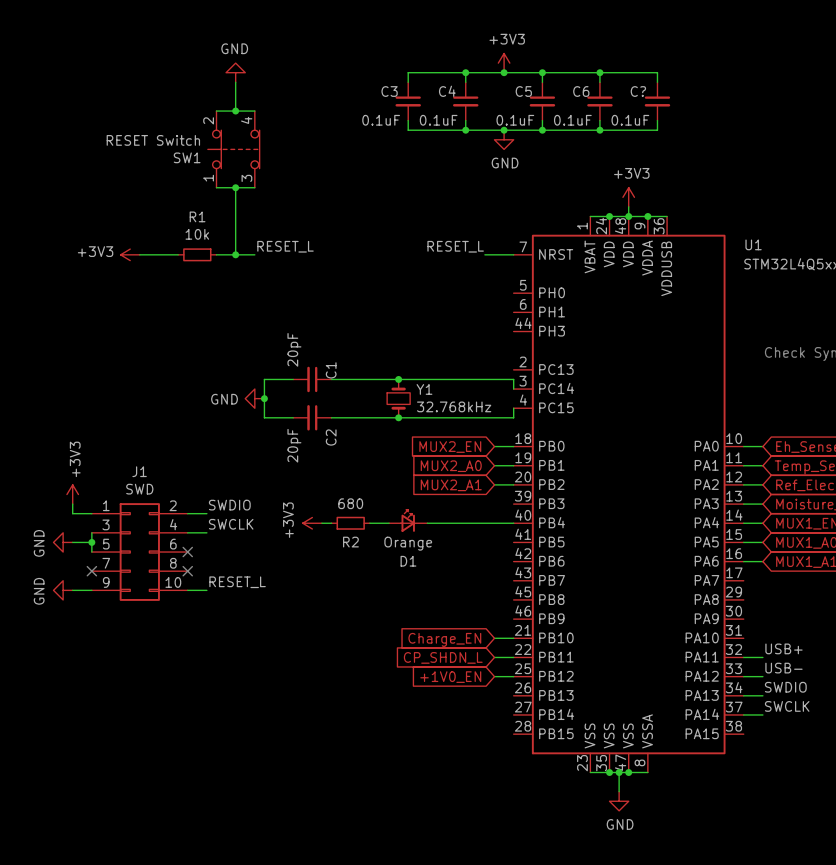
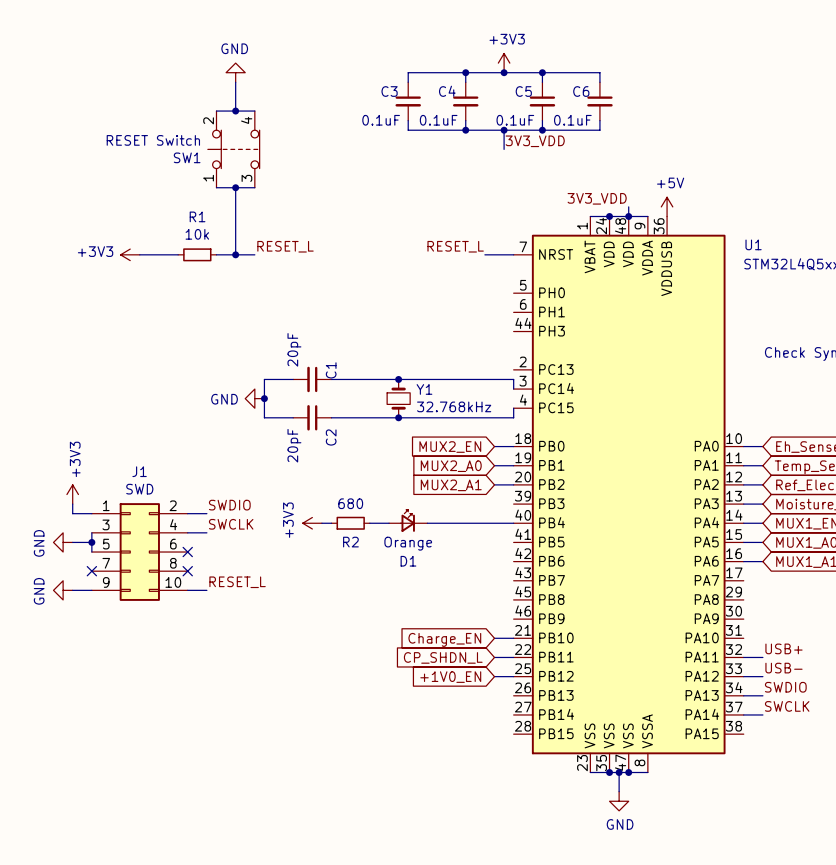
wire: (599, 72) (657, 72) (657, 82) -> none
junction: (599, 72) -> none
C?: 0.1uF (657, 101) -> none
wire: (657, 120) (657, 130) (599, 130) -> none
junction: (599, 130) -> none
power symbol: GND (504, 139) -> none
label: none -> 3V3_VDD (535, 141)
power symbol: +3V3 (628, 197) -> none
label: none -> 3V3_VDD (597, 198)
power symbol: none -> +5V (667, 206)
wire: (647, 216) (667, 216) -> none
junction: (647, 216) -> none

